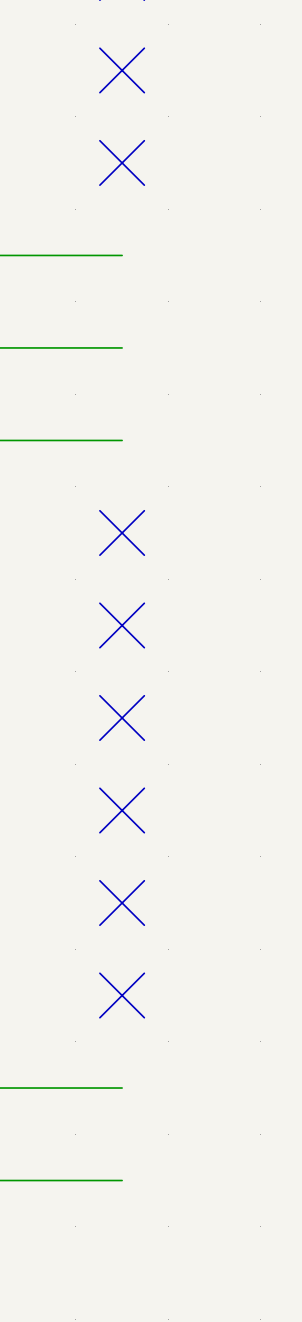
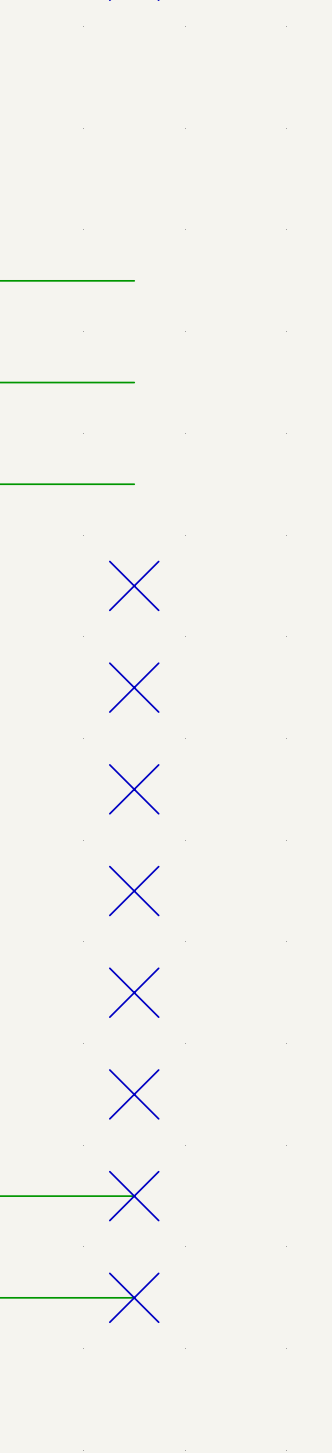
no-connect mark: (122, 70) -> none
no-connect mark: (122, 162) -> none
no-connect mark: none -> (134, 1196)
no-connect mark: none -> (134, 1297)

